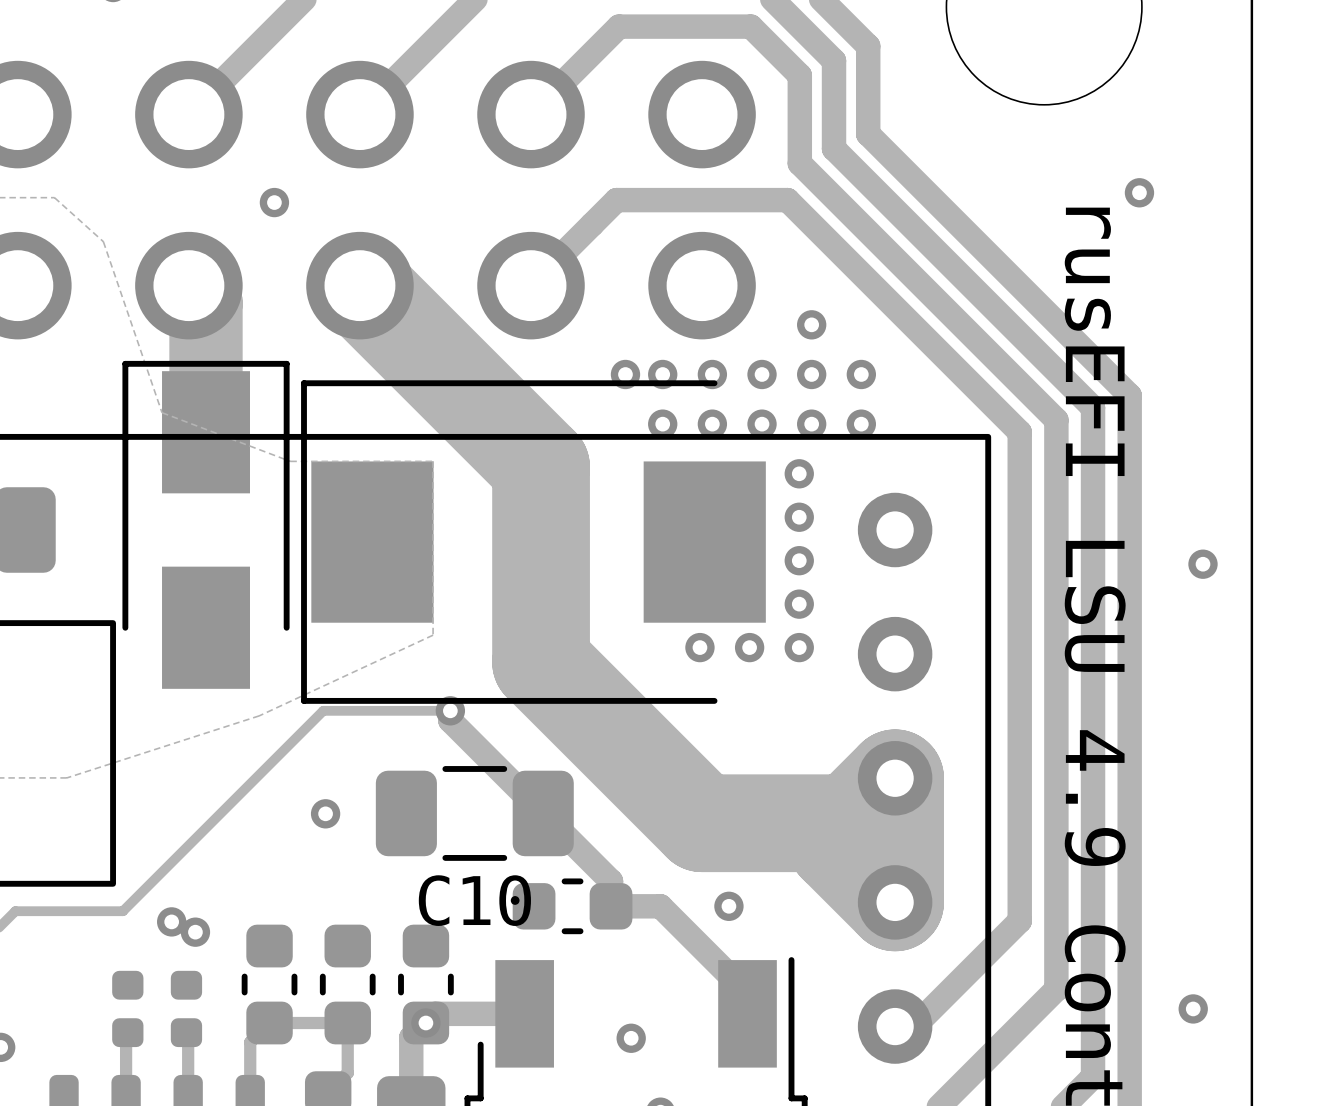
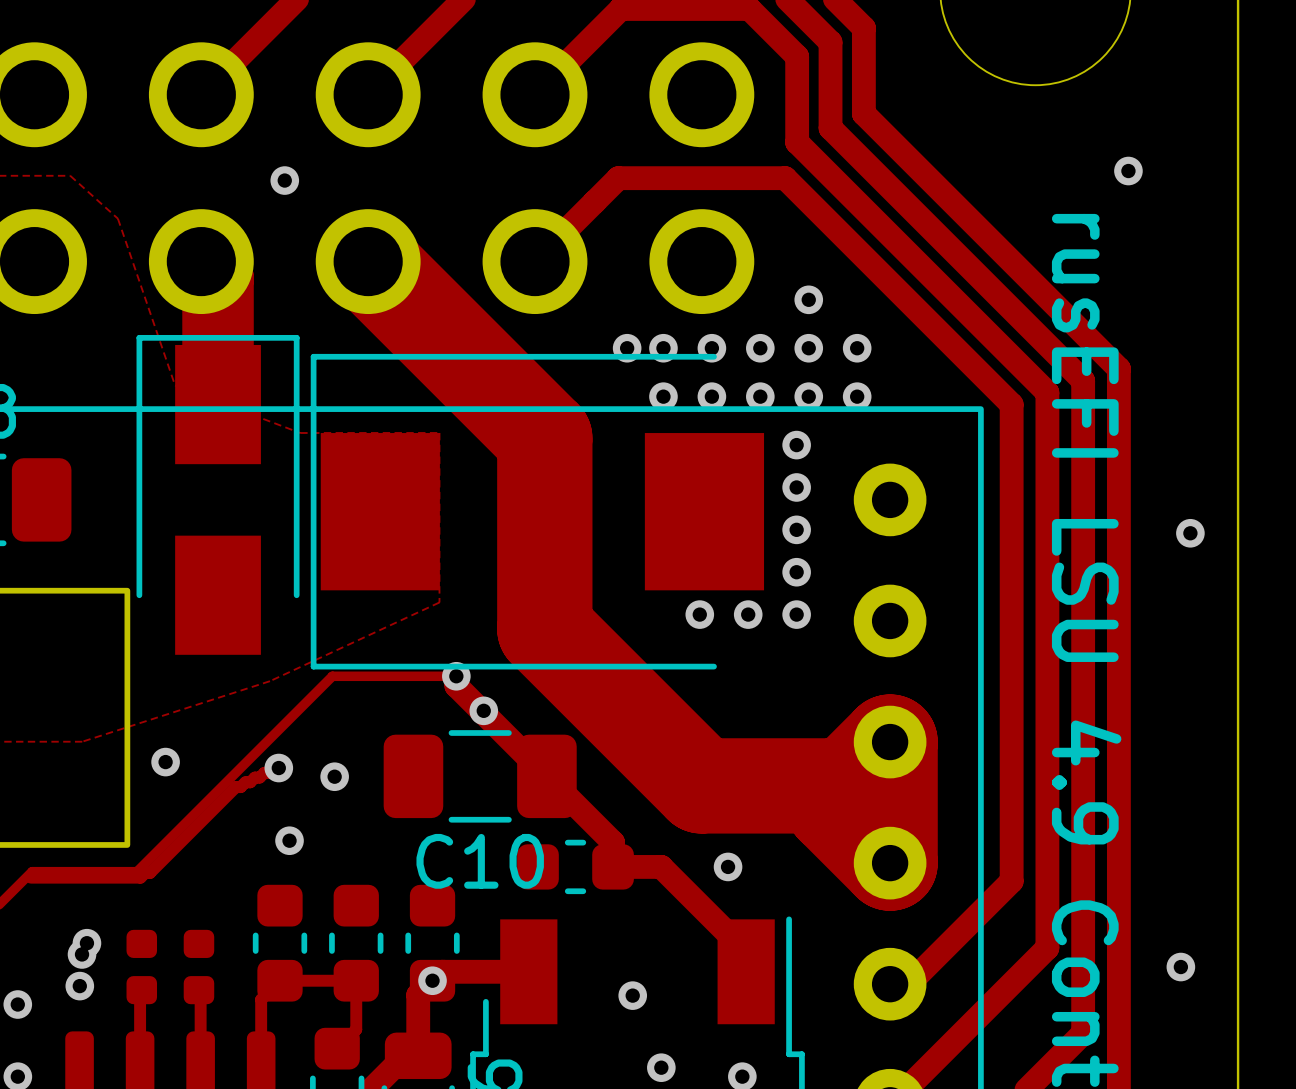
via: none -> (483, 710)
via: none -> (165, 762)
track: none -> (278, 768) (274, 768) (259, 777) (254, 777) (250, 782) (245, 782) (240, 787) (235, 787) (150, 872) (145, 872) (140, 877) (30, 877)
via: none -> (278, 768)
via: none -> (289, 840)
via: (171, 921) -> none
via: (195, 932) -> none
via: none -> (86, 943)
via: none -> (82, 954)
via: none -> (79, 986)

